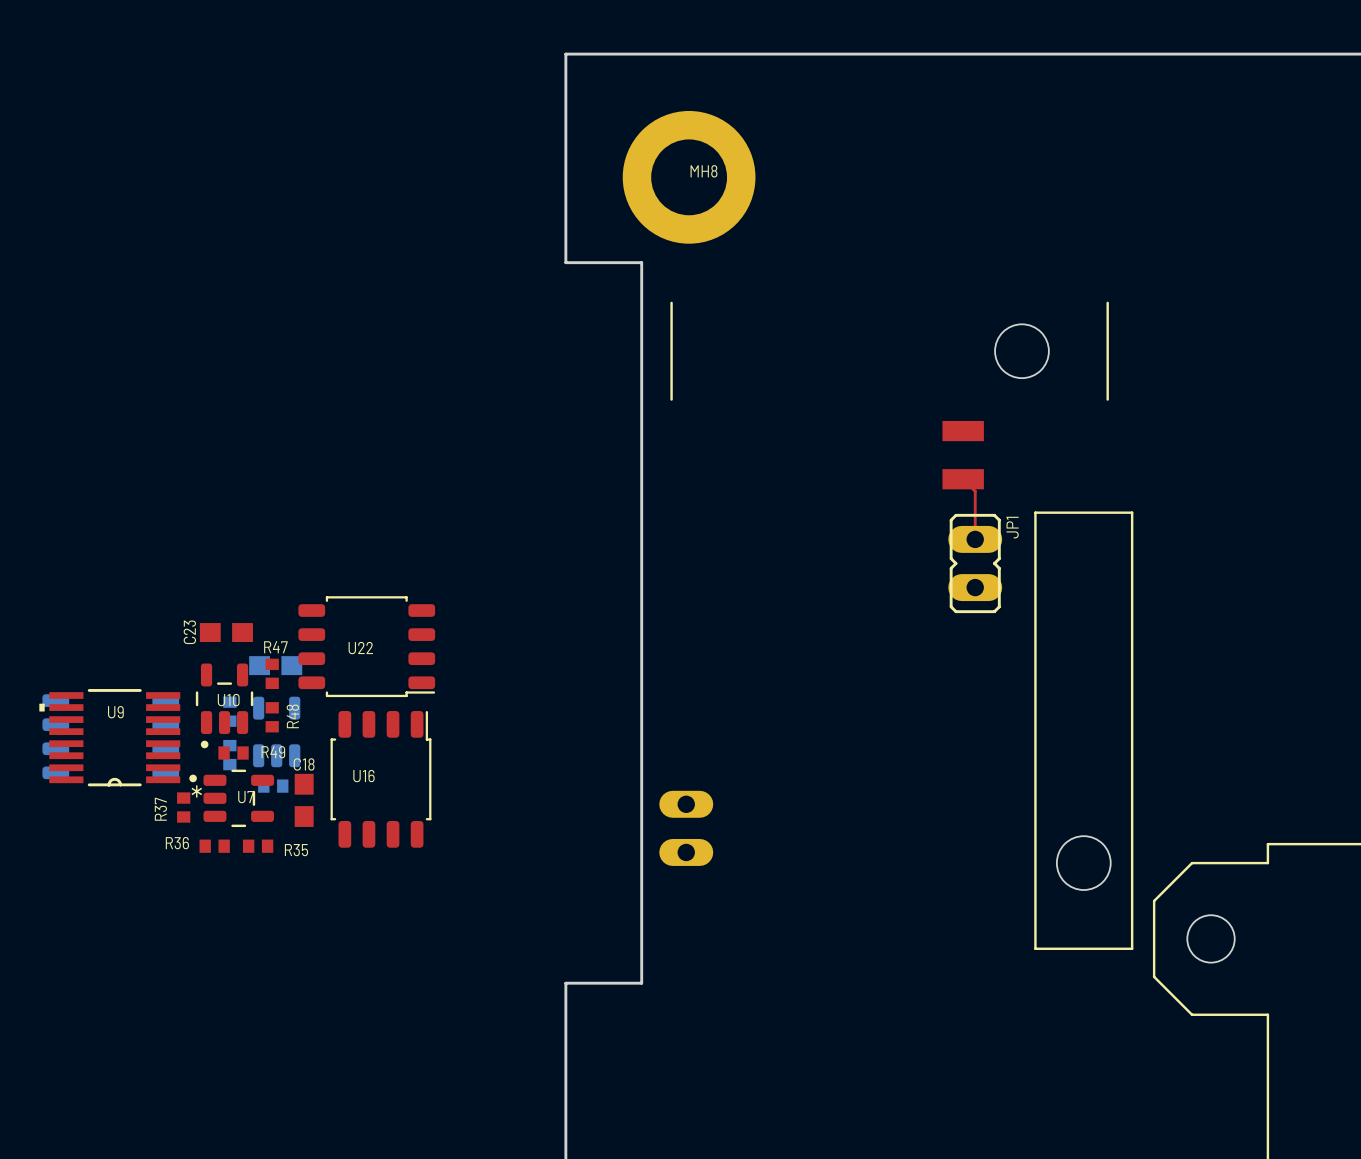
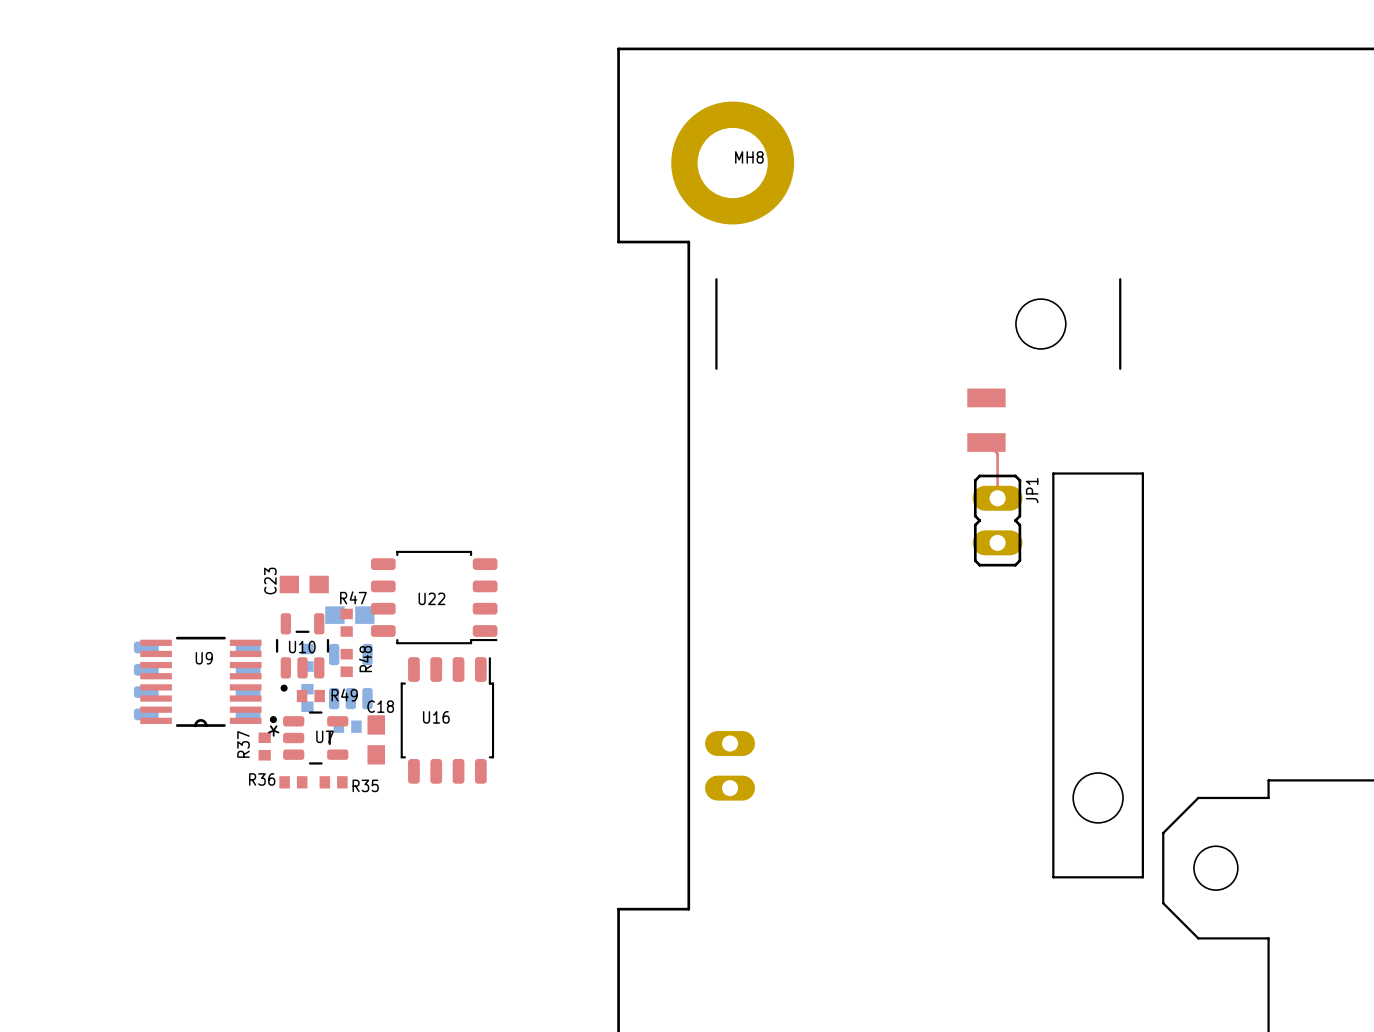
U9 footprint: [39, 689, 181, 787] -> [140, 636, 262, 728]

